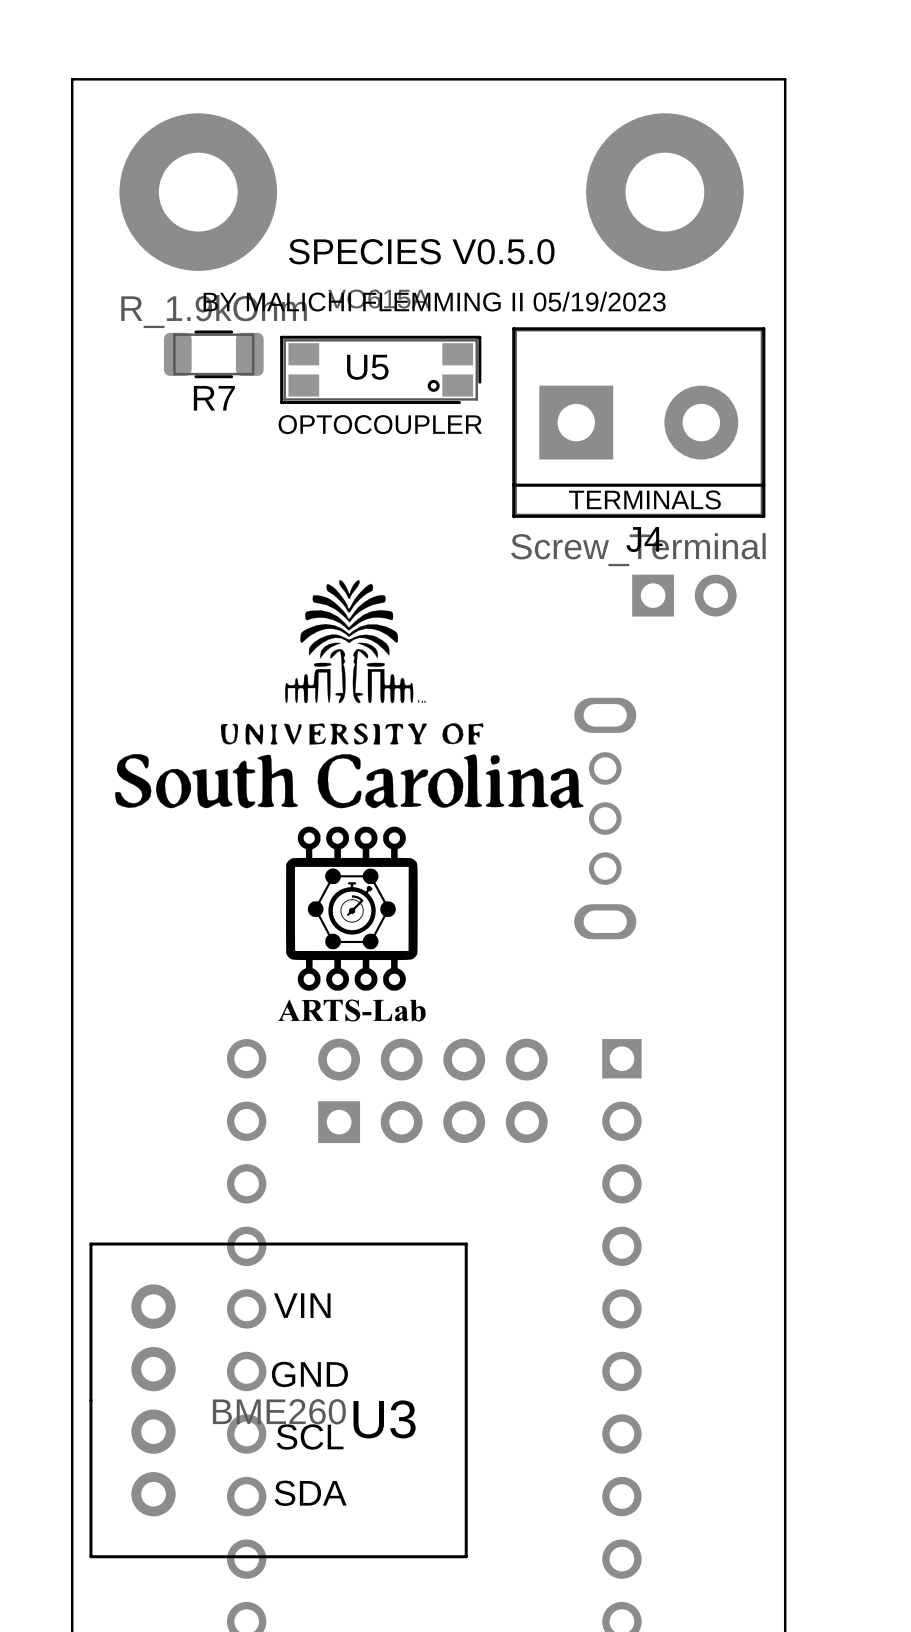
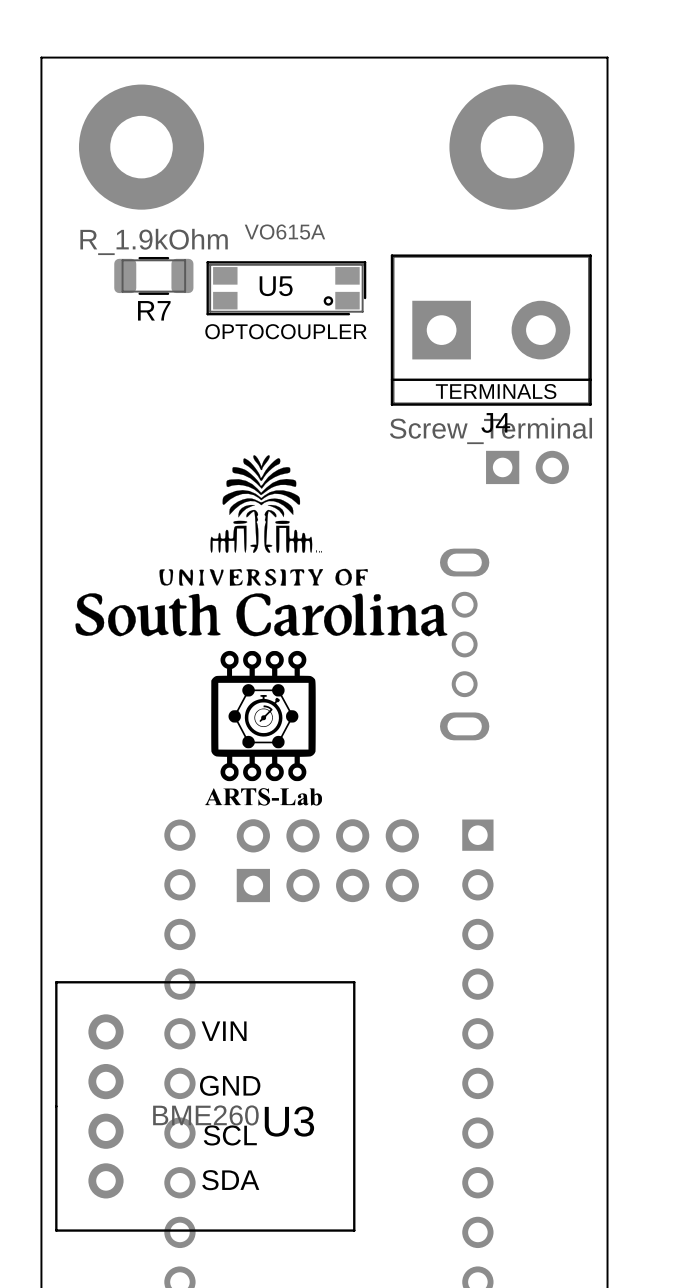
text: SPECIES V0.5.0 (421, 251) -> none
text: BY MALICHI FLEMMING II 05/19/2023 (434, 301) -> none

